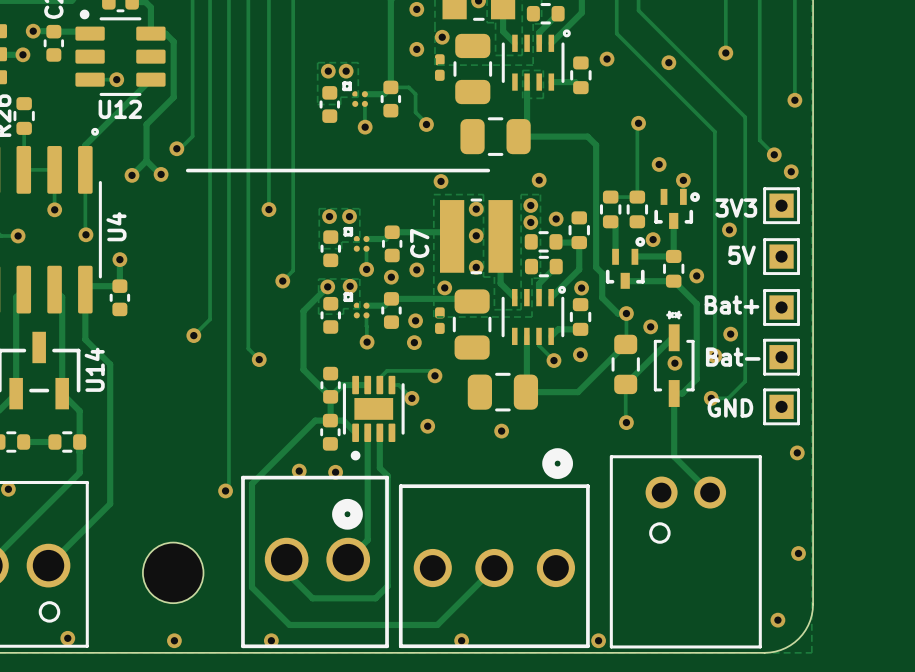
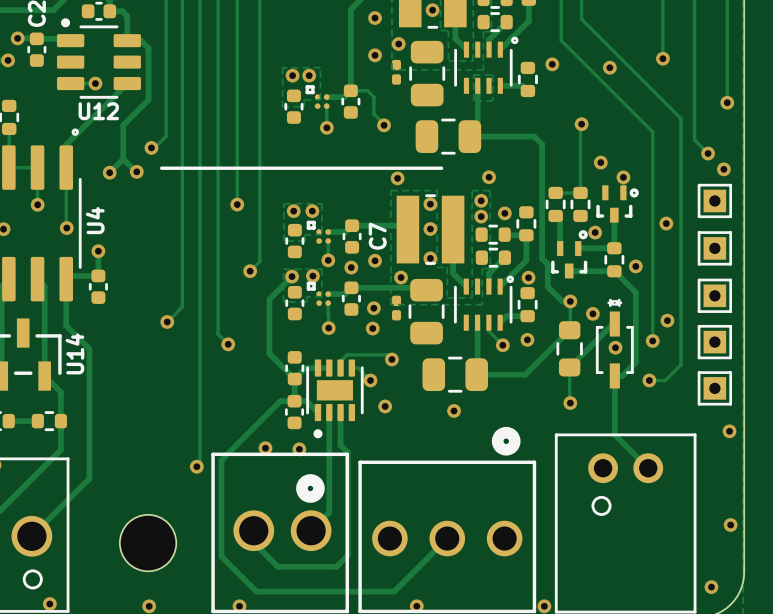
text: 3V3 (736, 208) -> none
text: 5V (742, 255) -> none
text: Bat+ (732, 304) -> none
text: Bat- (733, 357) -> none
text: GND (730, 407) -> none

